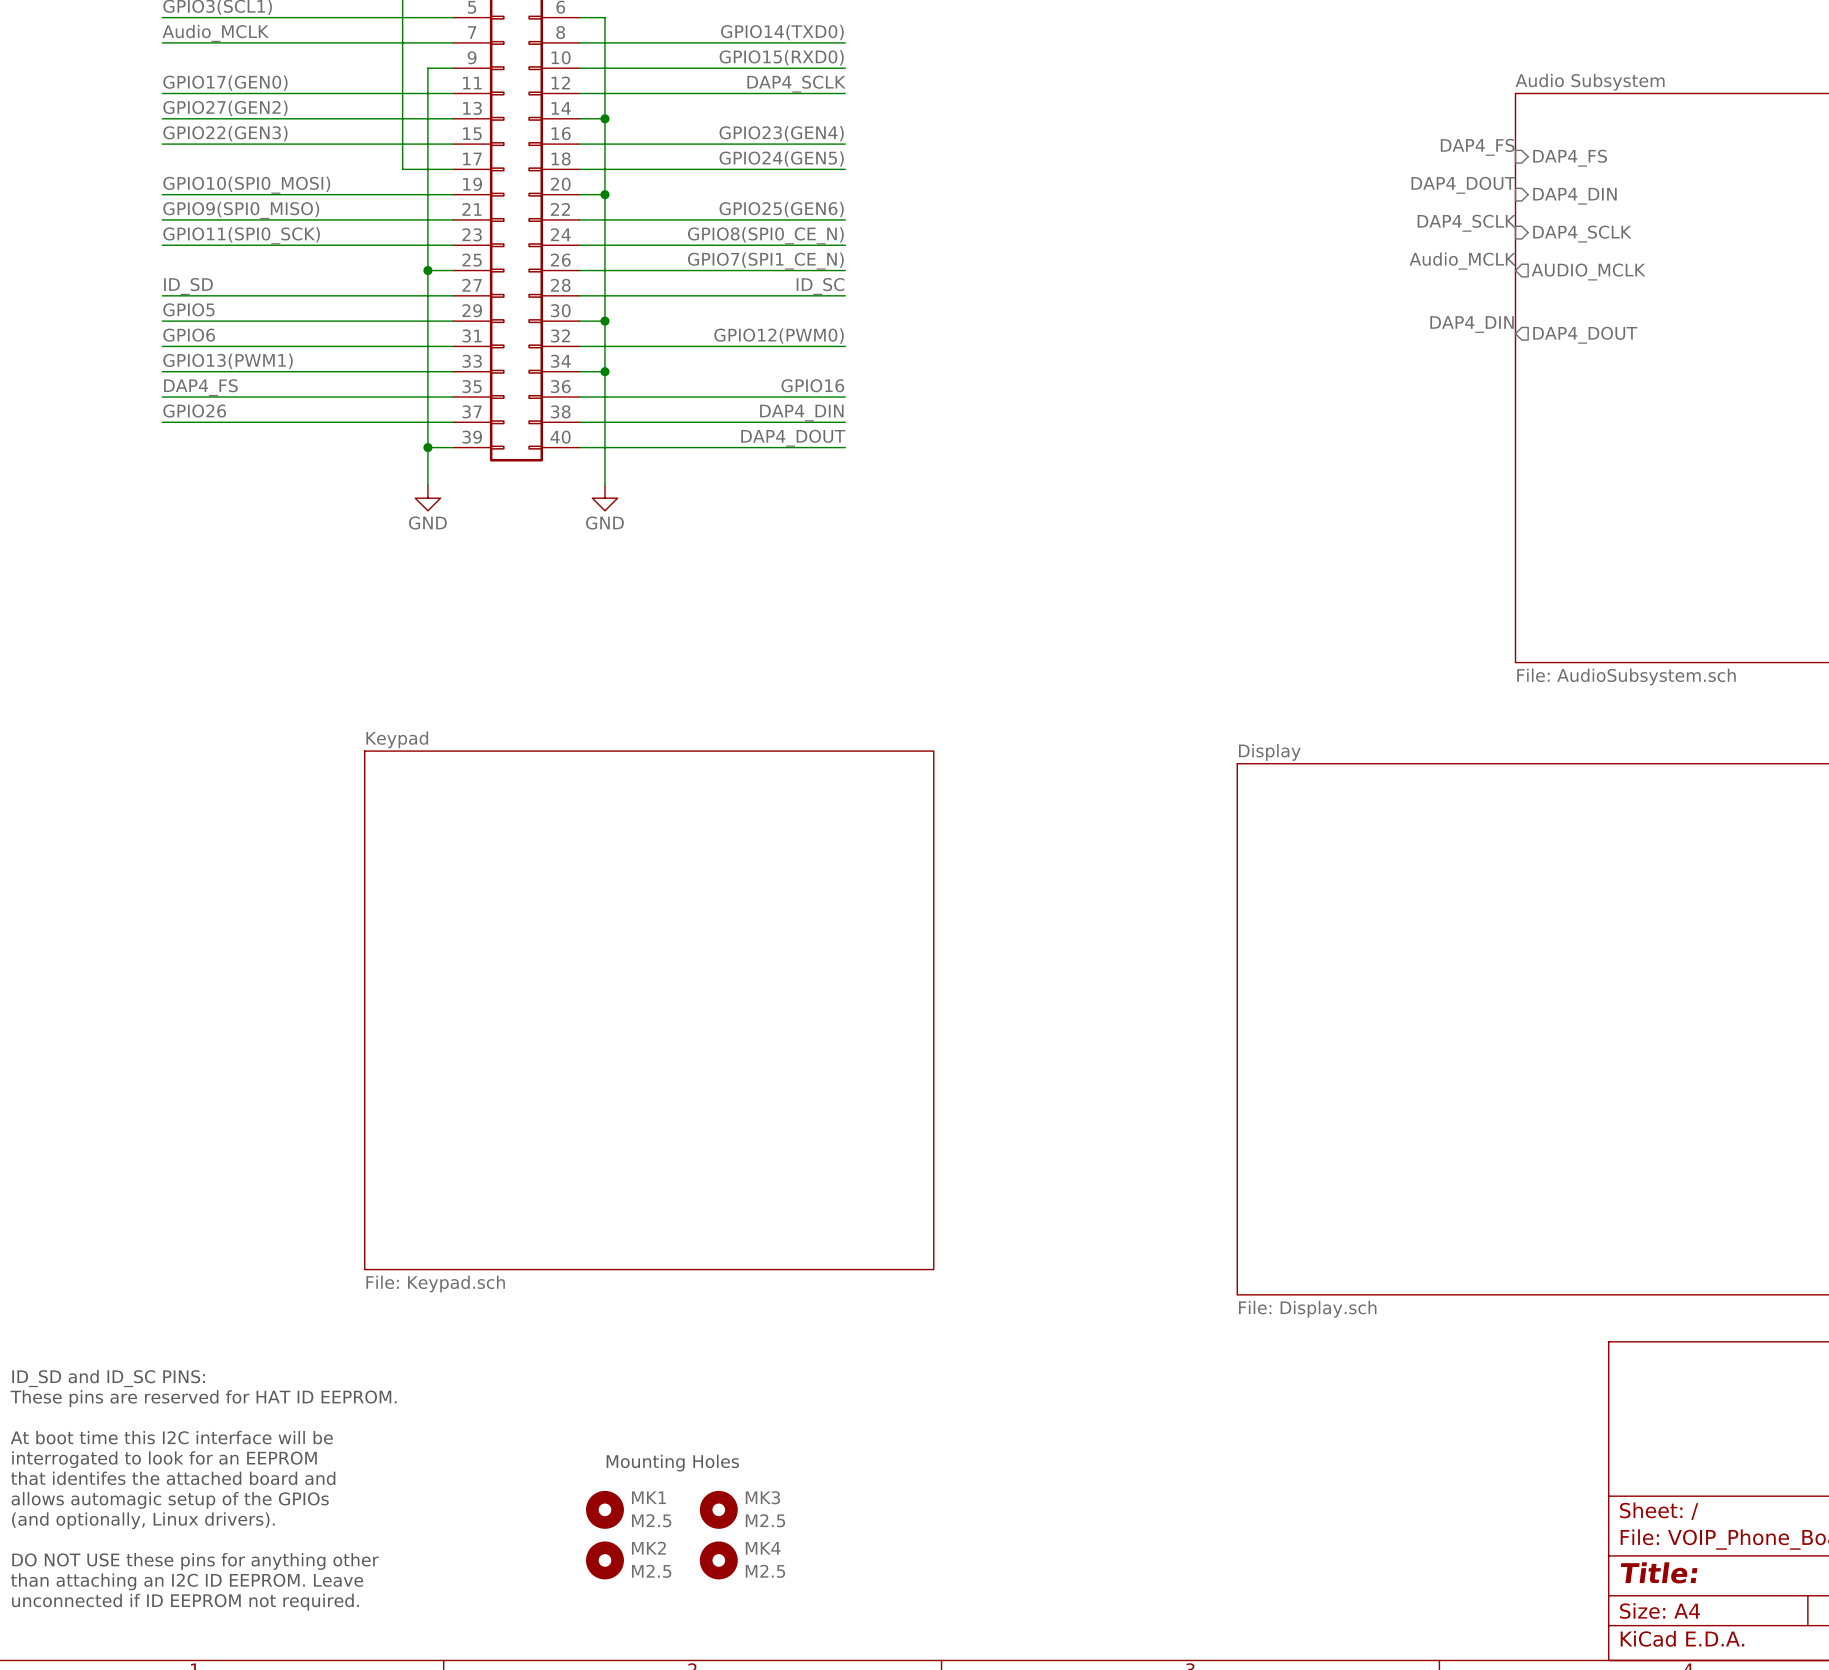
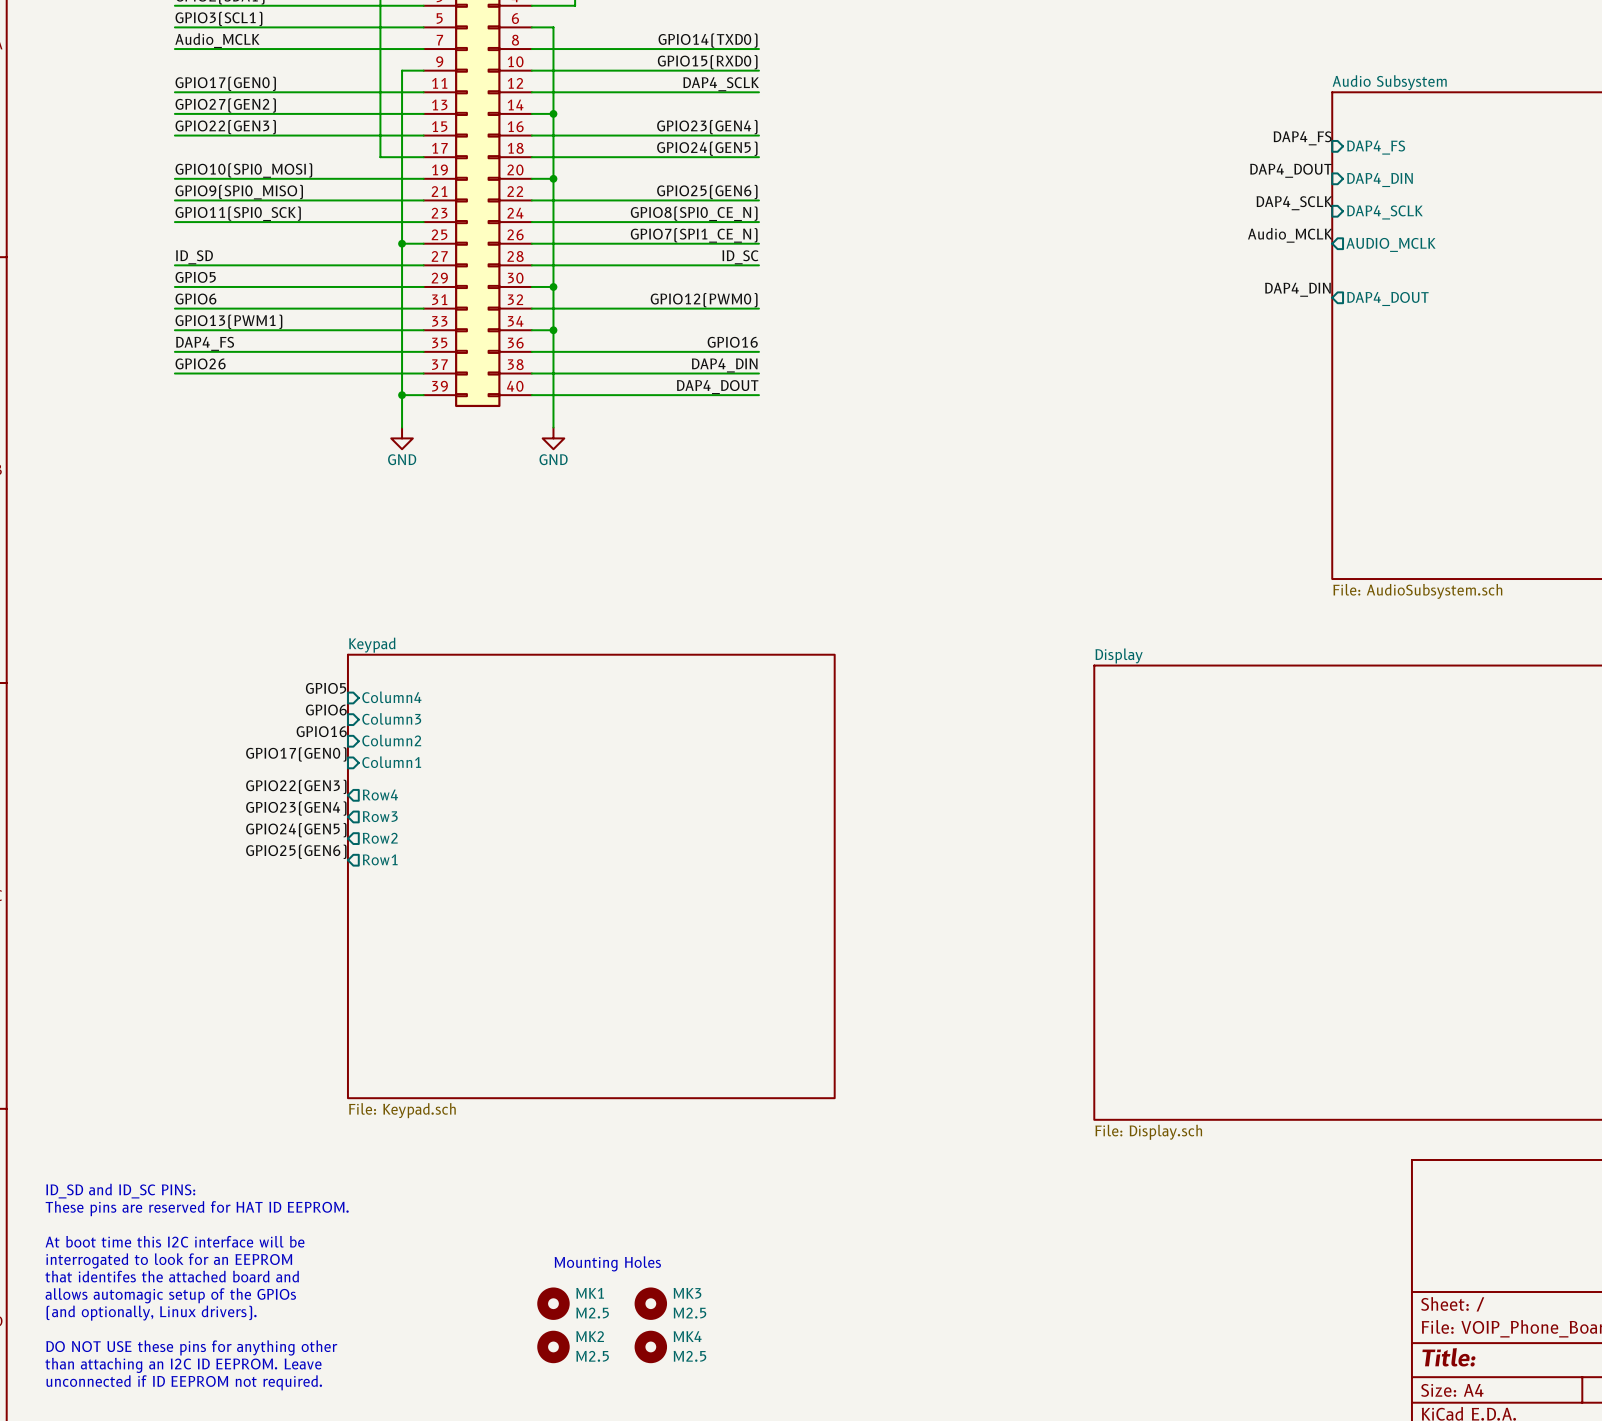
label: none -> GPIO5 (326, 688)
sheet pin: none -> Column4 (391, 697)
label: none -> GPIO6 (326, 710)
sheet pin: none -> Column3 (391, 718)
label: none -> GPIO16 (321, 731)
sheet pin: none -> Column2 (391, 740)
label: none -> GPIO17(GEN0) (296, 754)
sheet pin: none -> Column1 (391, 762)
label: none -> GPIO22(GEN3) (296, 786)
sheet pin: none -> Row4 (380, 794)
label: none -> GPIO23(GEN4) (296, 808)
sheet pin: none -> Row3 (380, 816)
label: none -> GPIO24(GEN5) (296, 830)
sheet pin: none -> Row2 (380, 838)
label: none -> GPIO25(GEN6) (296, 851)
sheet pin: none -> Row1 (380, 859)

